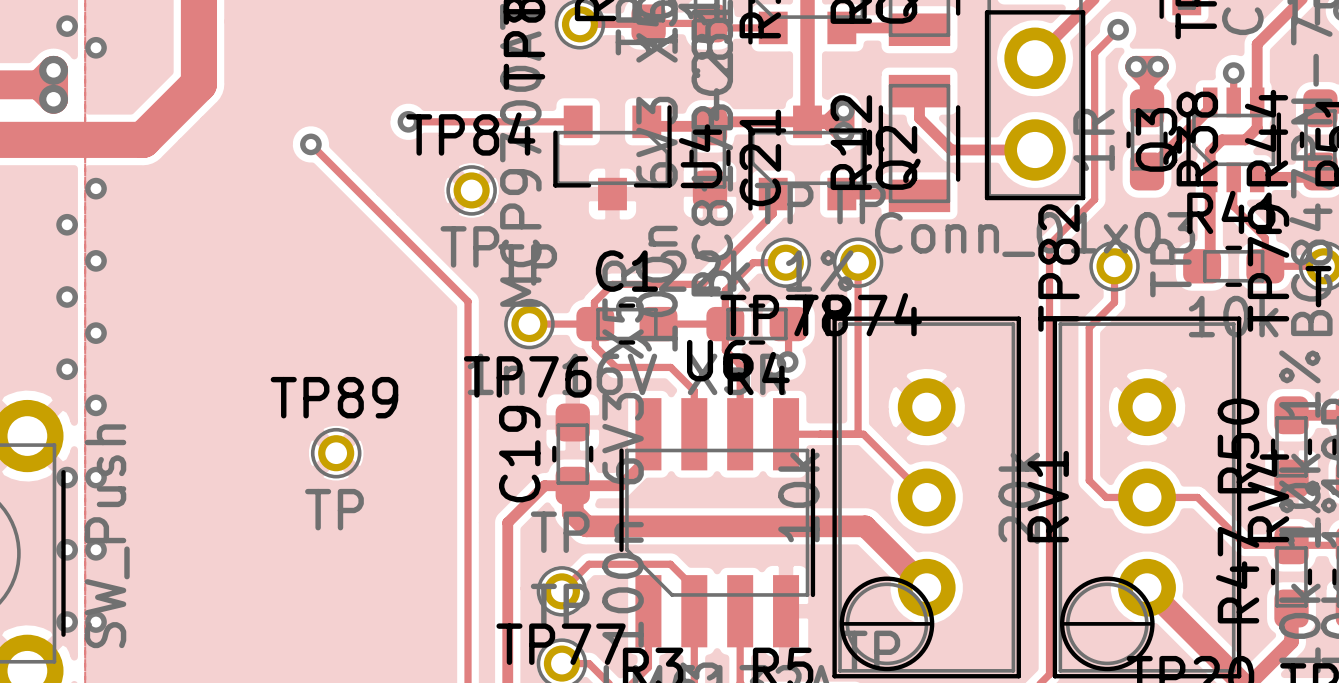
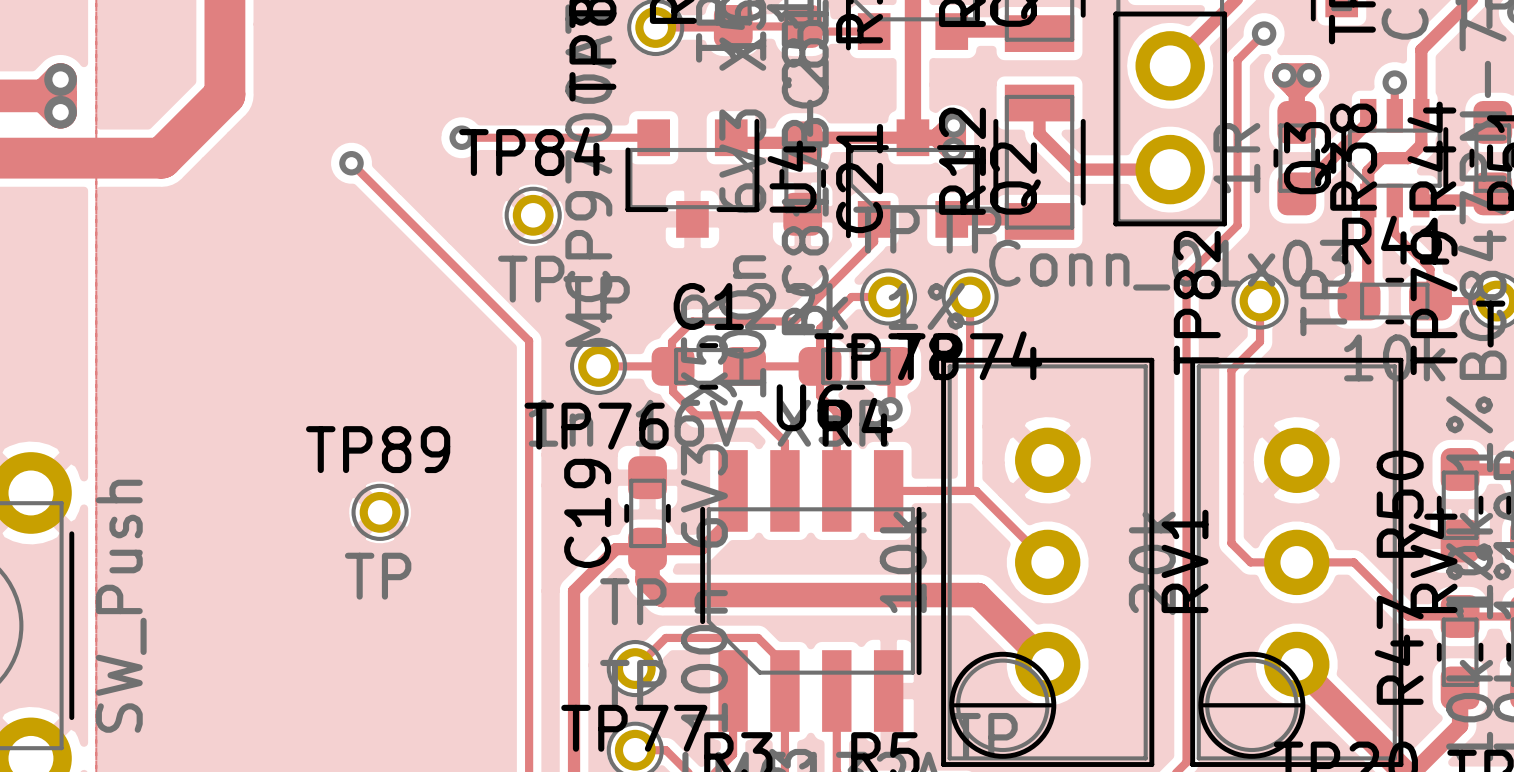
via: (67, 26) -> none
via: (96, 47) -> none
via: (96, 188) -> none
via: (67, 224) -> none
via: (96, 260) -> none
via: (67, 297) -> none
via: (96, 333) -> none
via: (67, 369) -> none
via: (96, 405) -> none
via: (67, 477) -> none
via: (96, 477) -> none
via: (67, 549) -> none
via: (96, 549) -> none
via: (67, 622) -> none
via: (96, 622) -> none

